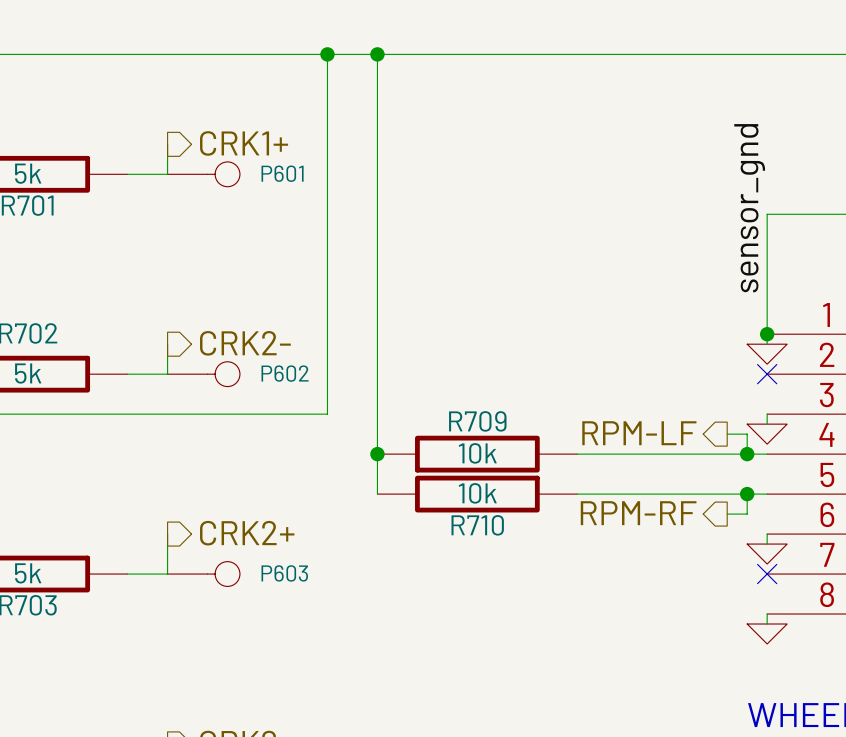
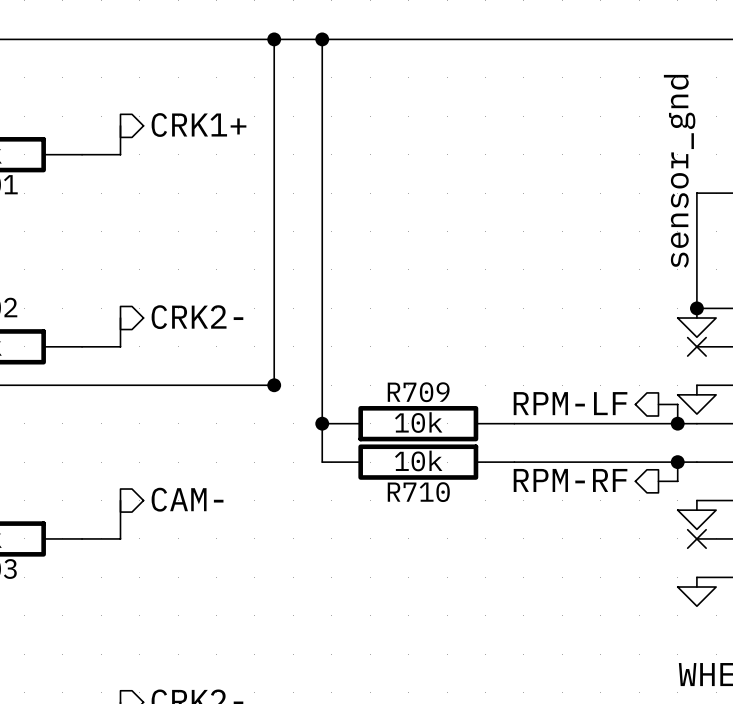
P601: (203, 174) -> none
P602: (203, 374) -> none
junction: none -> (274, 385)
hierarchical label: CRK2+ (247, 533) -> CAM- (187, 499)
P603: (203, 574) -> none

